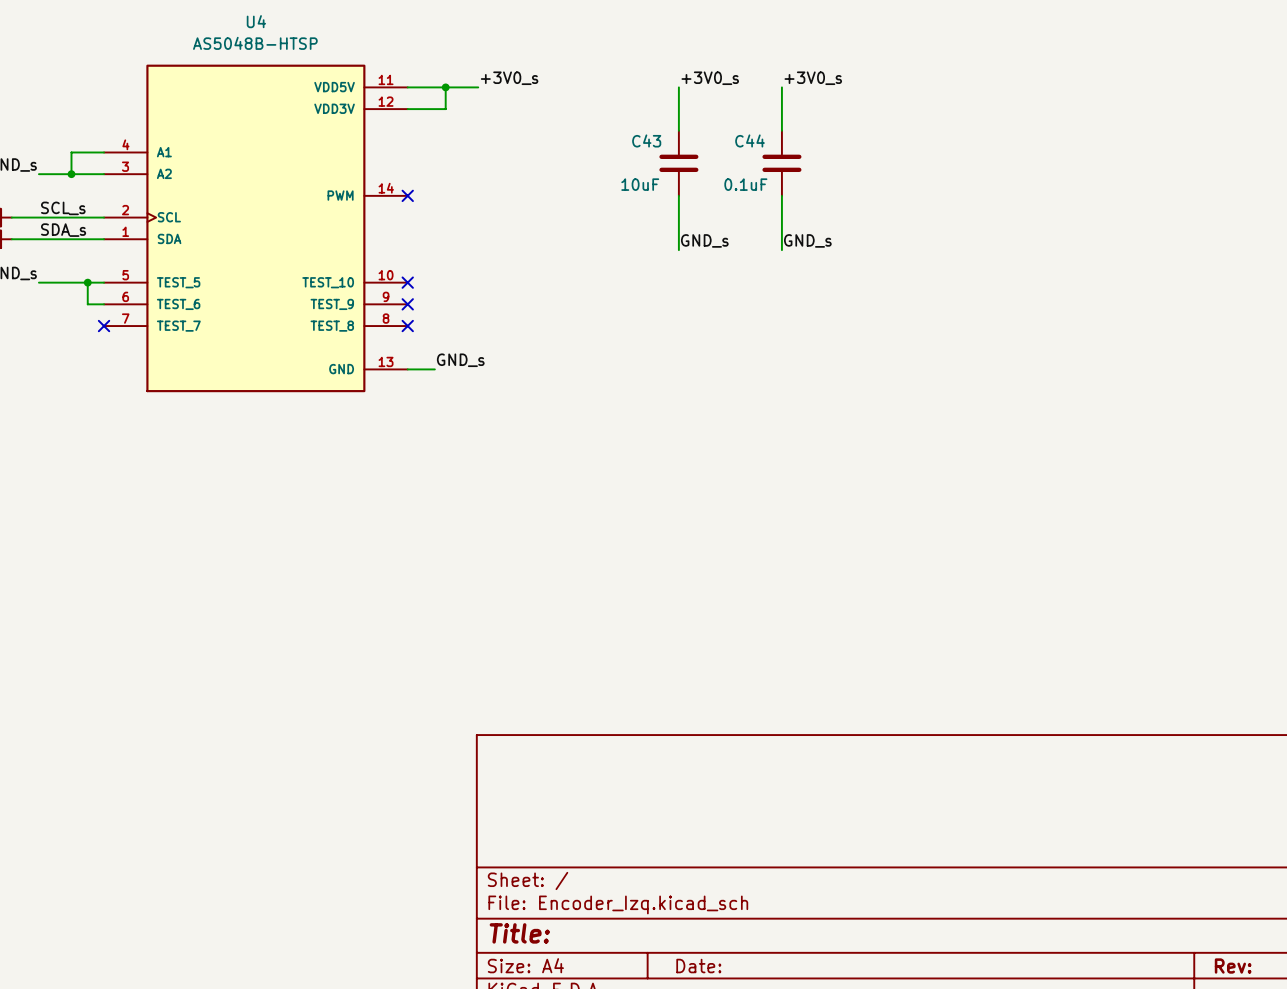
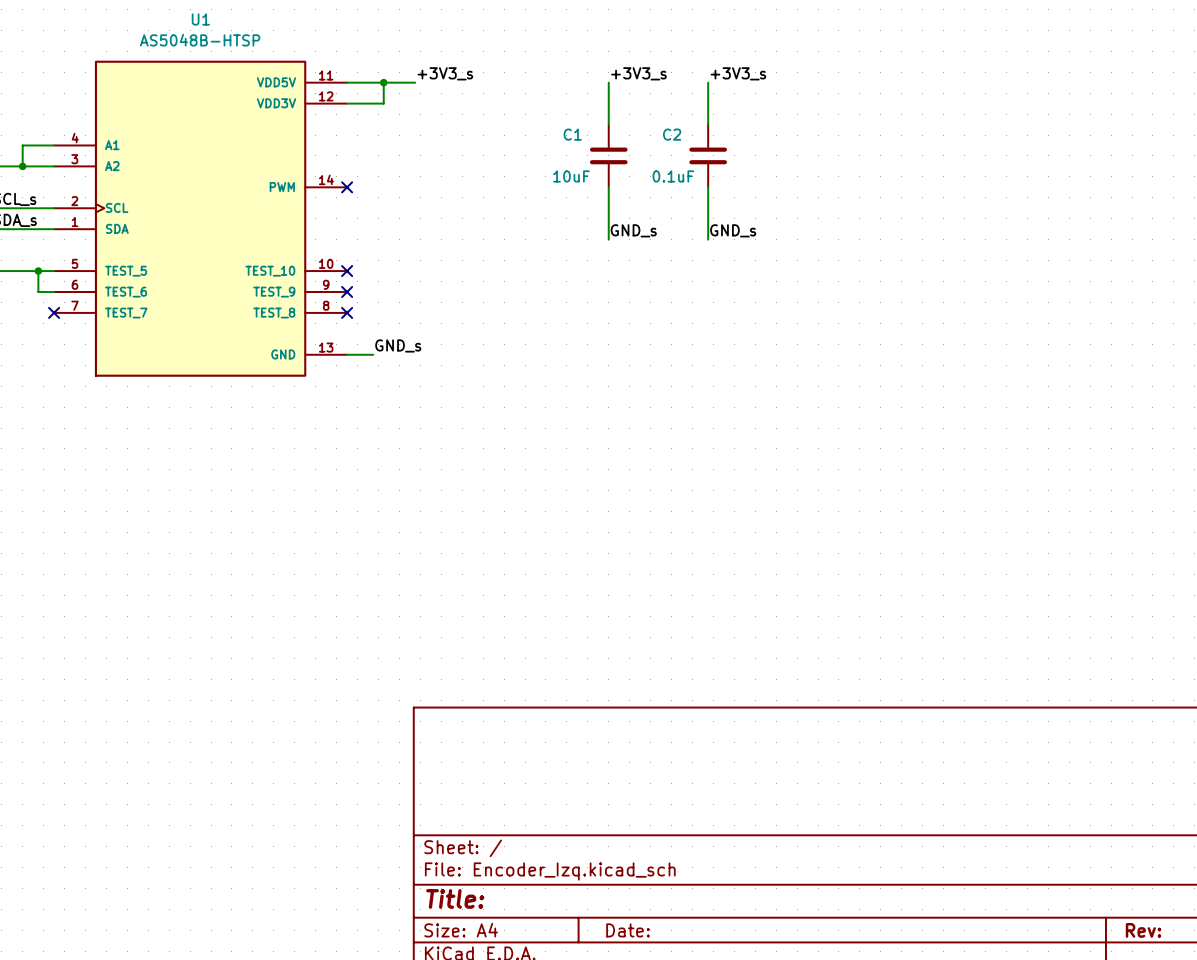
U4 name: U4 (256, 21) -> U1 (200, 19)
label: +3V0_s (509, 78) -> +3V3_s (445, 73)
label: +3V0_s (710, 78) -> +3V3_s (638, 73)
label: +3V0_s (813, 78) -> +3V3_s (738, 73)
C43 name: C43 (646, 140) -> C1 (572, 134)
C44 name: C44 (750, 140) -> C2 (672, 134)

